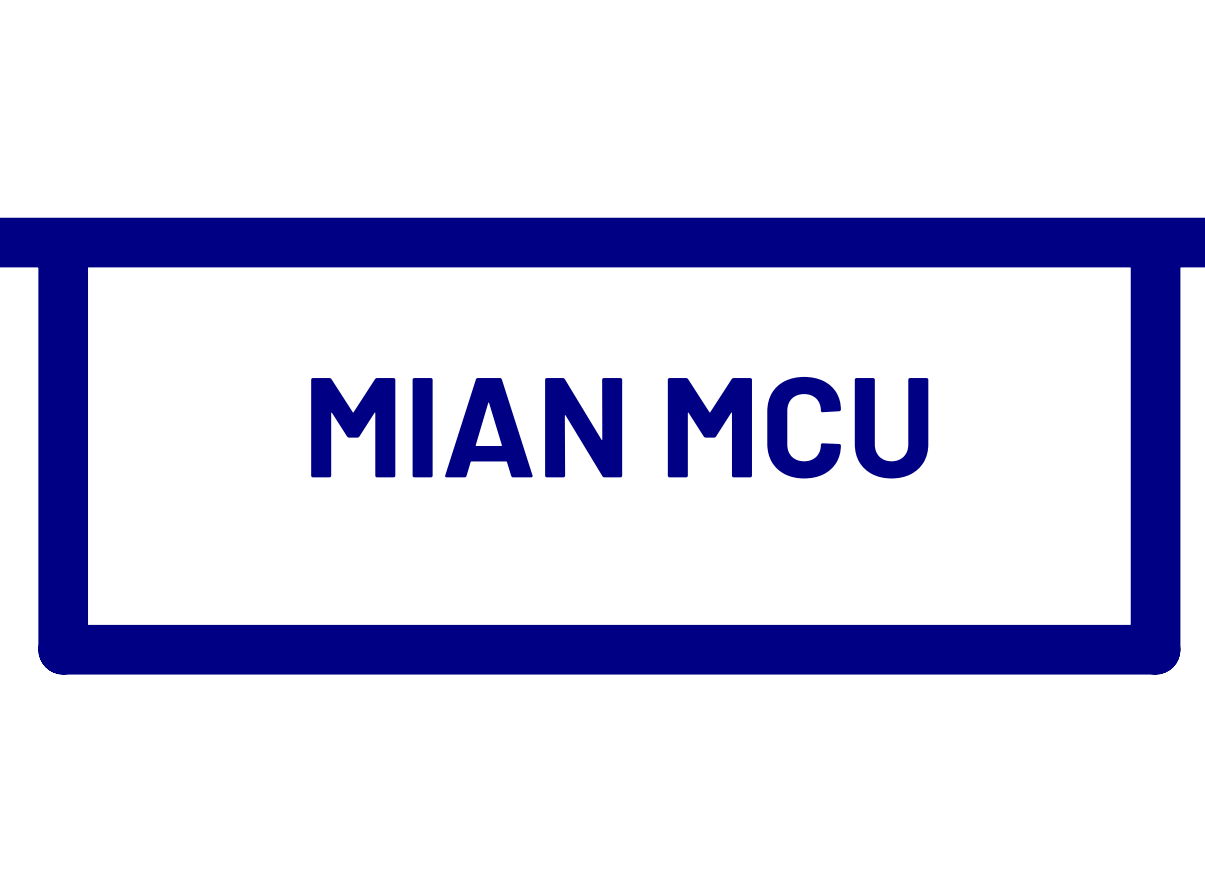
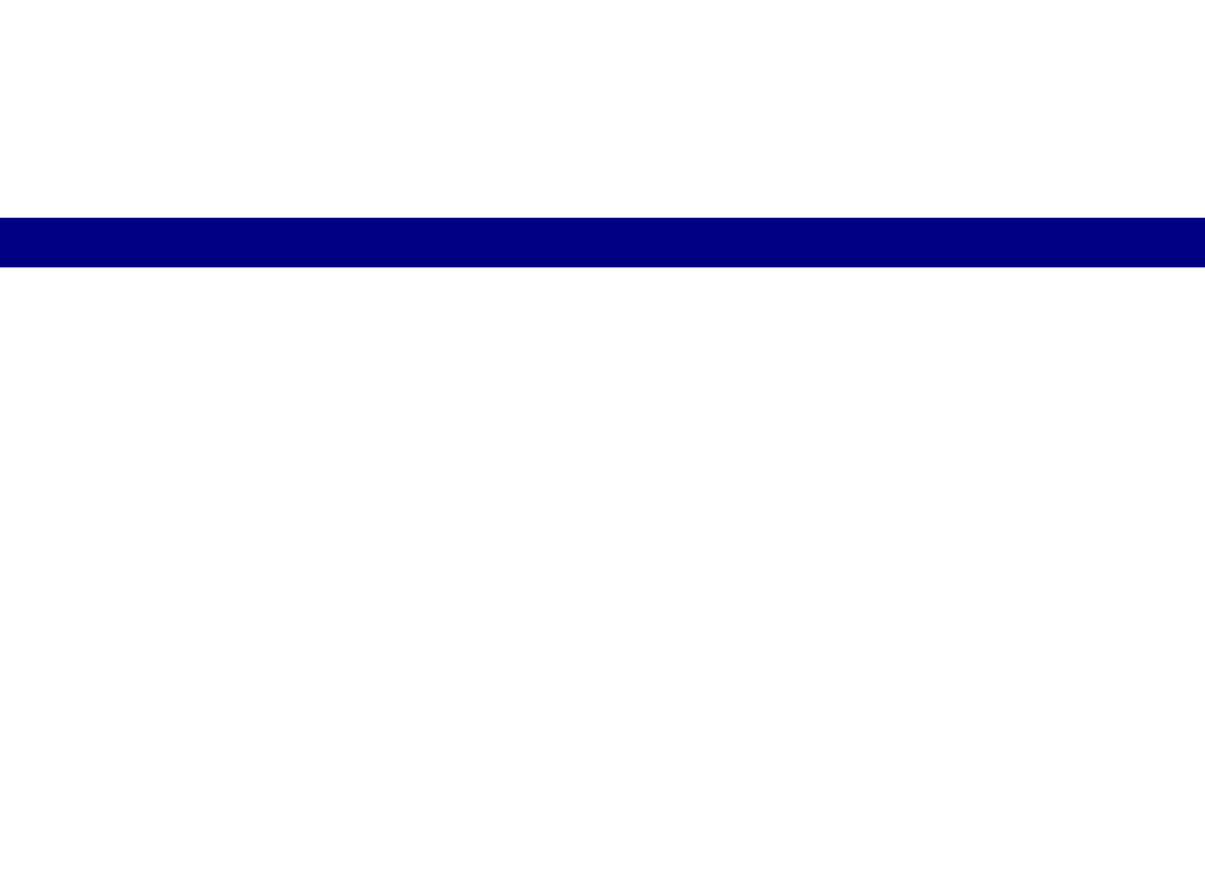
line: (63, 252) (63, 649) (1155, 649) (1155, 252) -> none
text: MIAN MCU (619, 427) -> none

